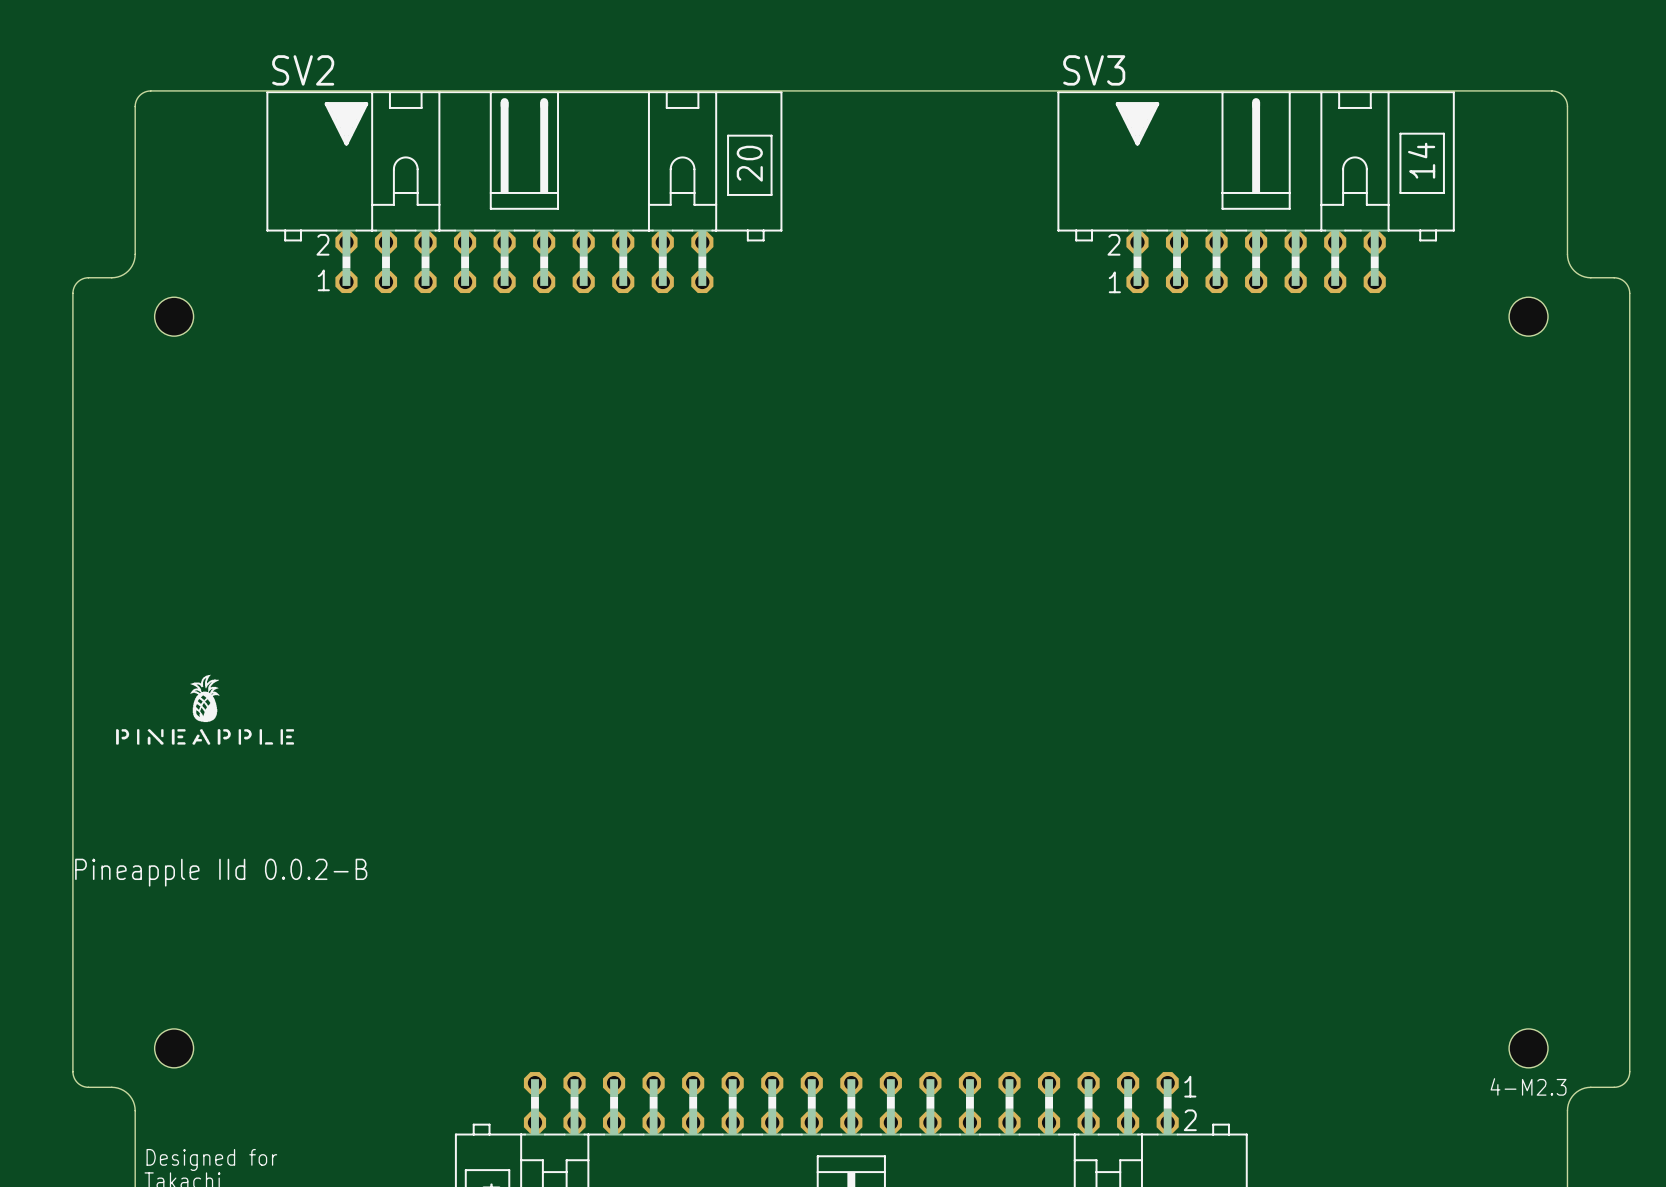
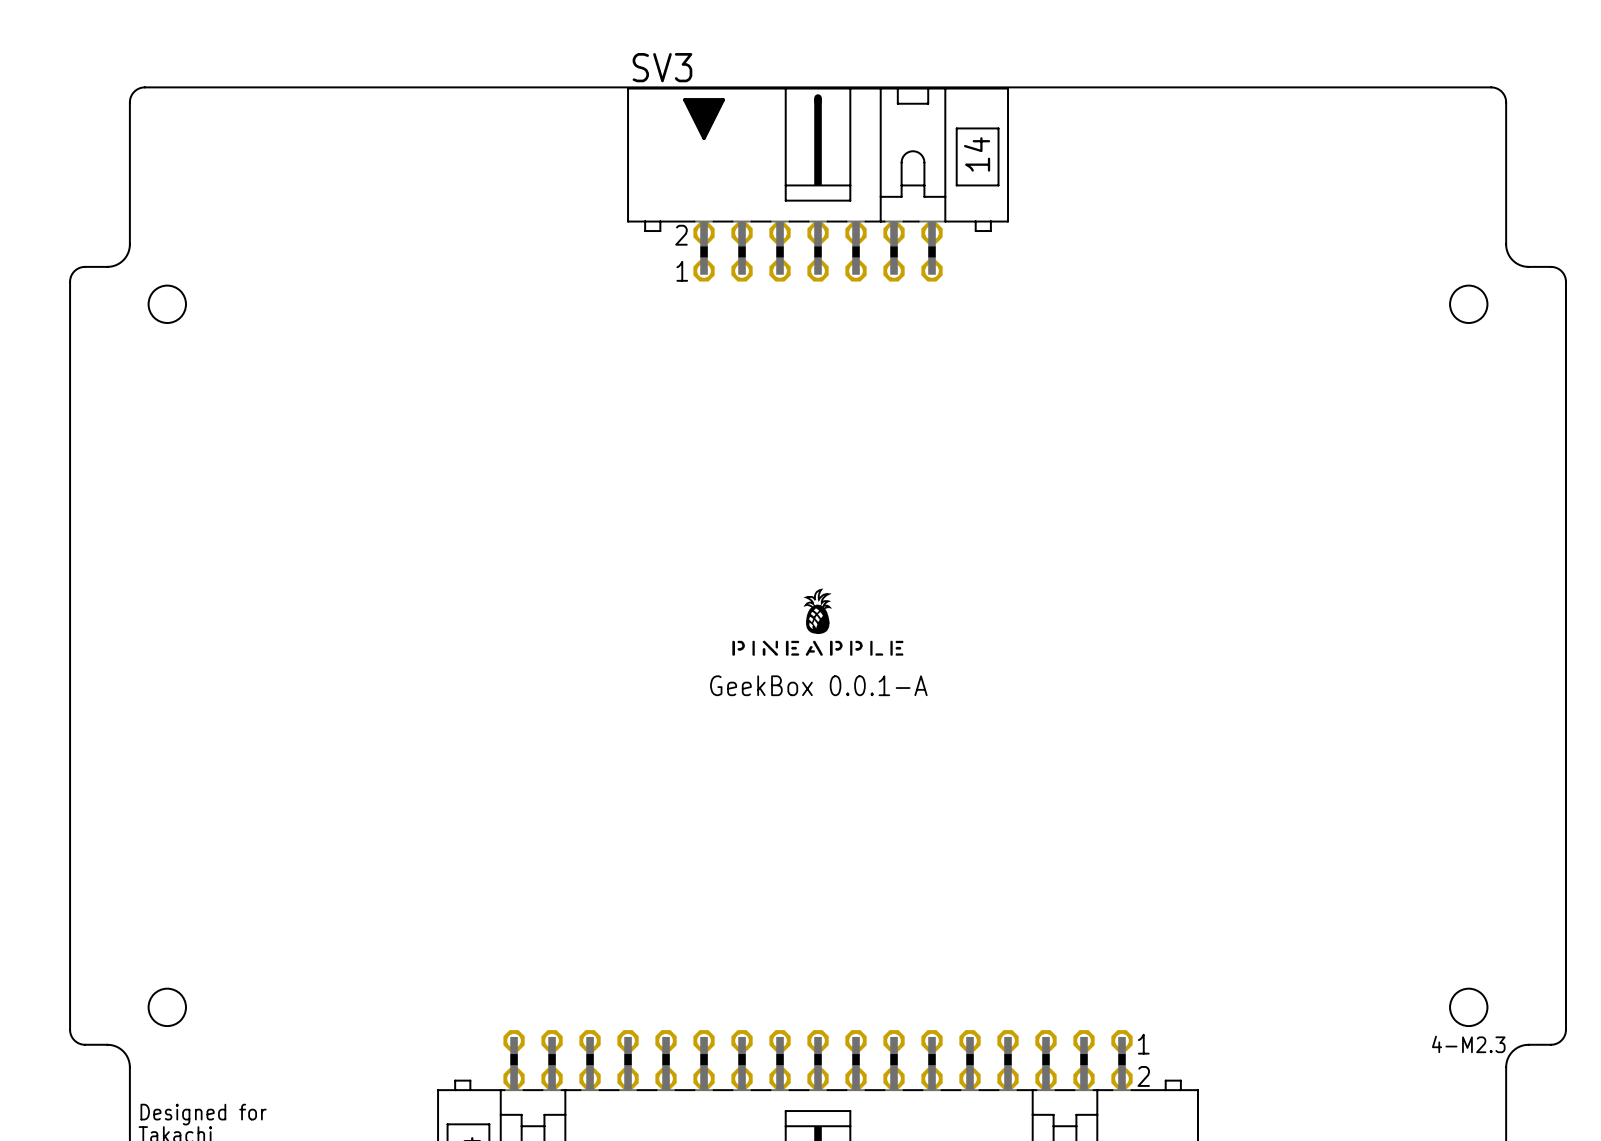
SV2: (524, 192) -> none
SV3 position: (1256, 192) -> (818, 184)
drawing: none -> [732, 588, 904, 656]
drawing: [116, 674, 295, 745] -> none
text: none -> GeekBox 0.0.1-A (818, 685)
text: Pineapple IId 0.0.2-B (221, 872) -> none

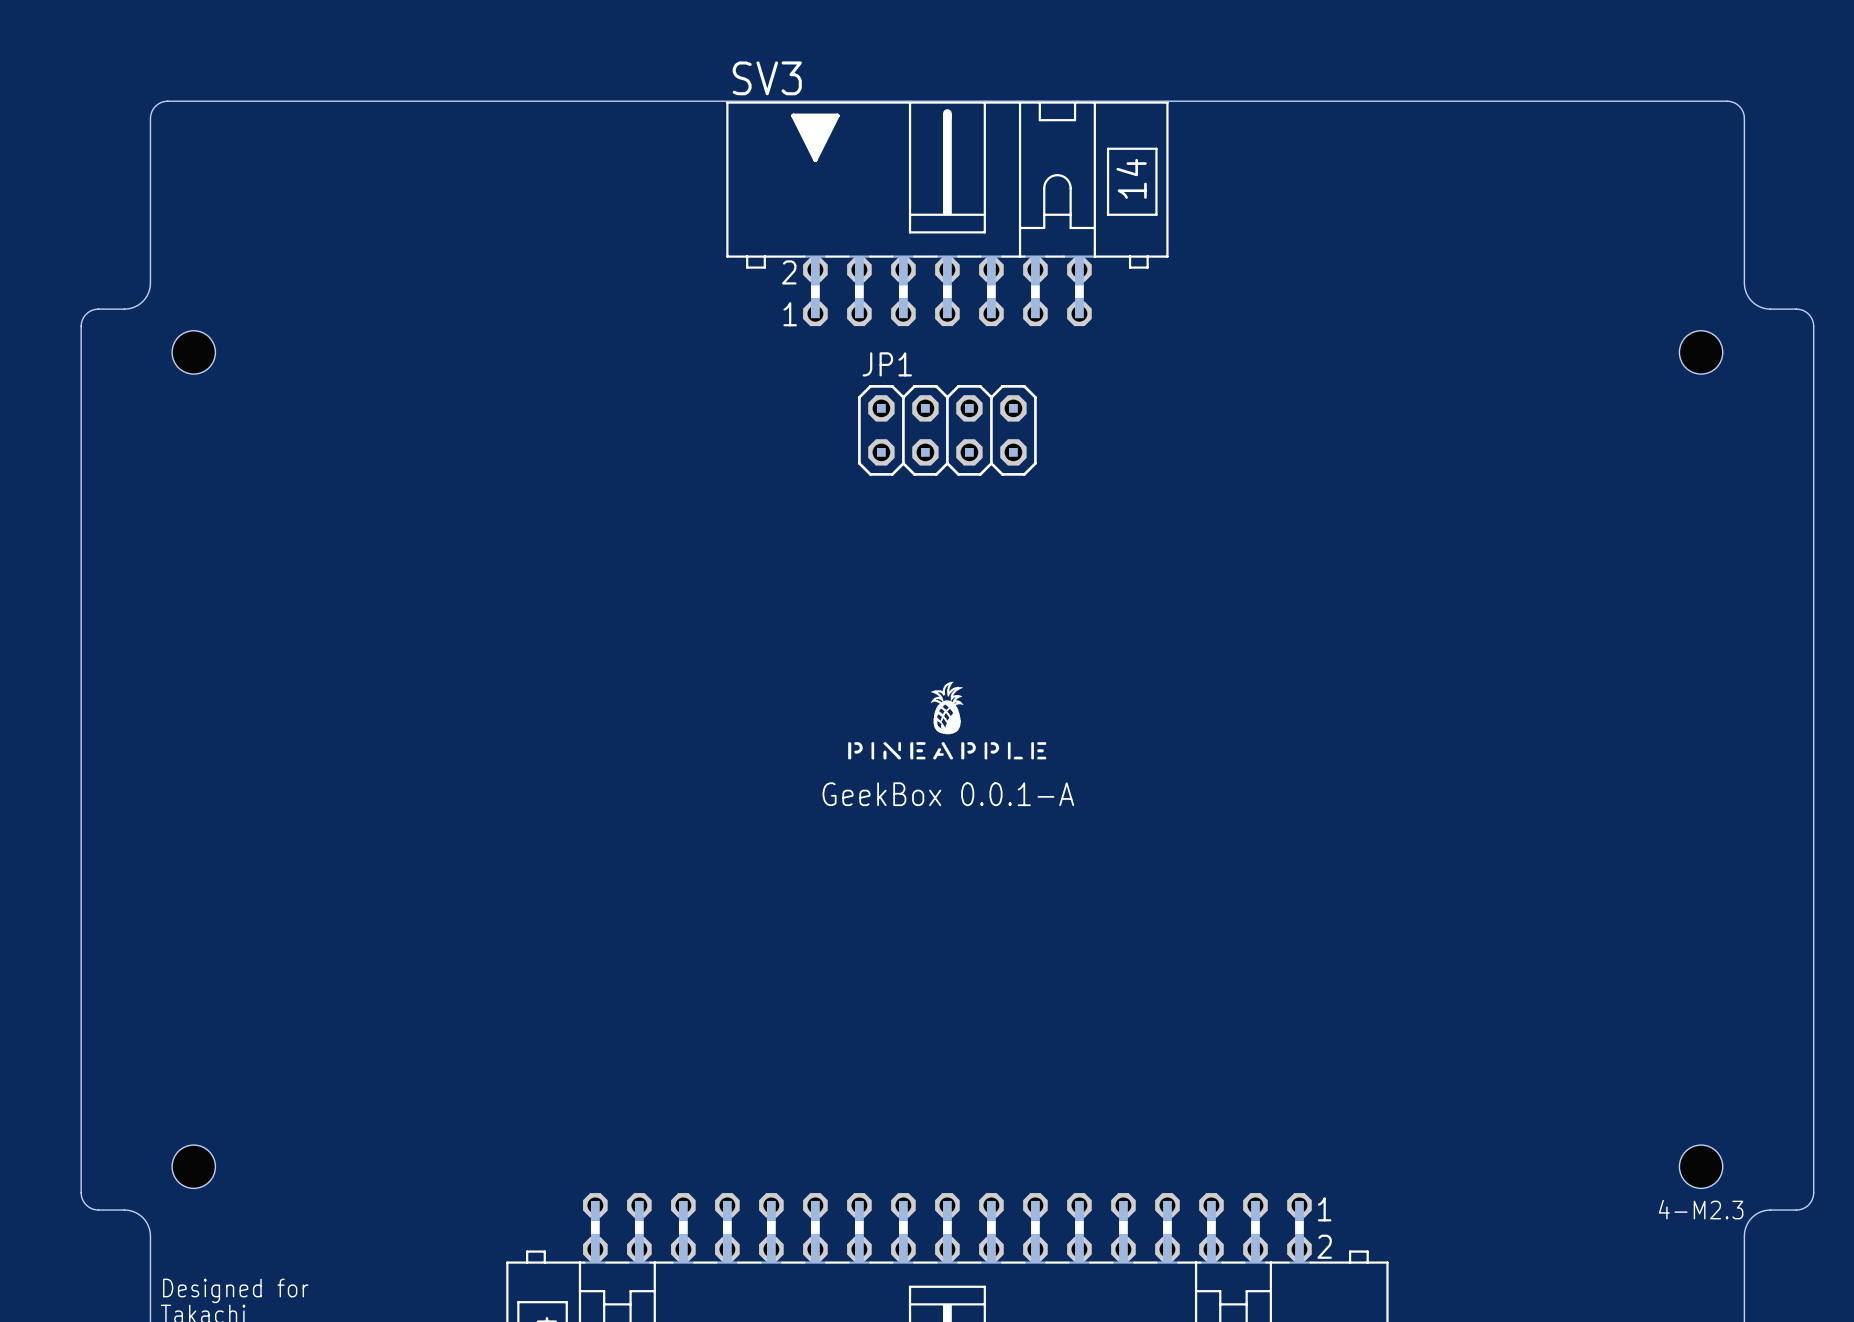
JP1: none -> (947, 430)

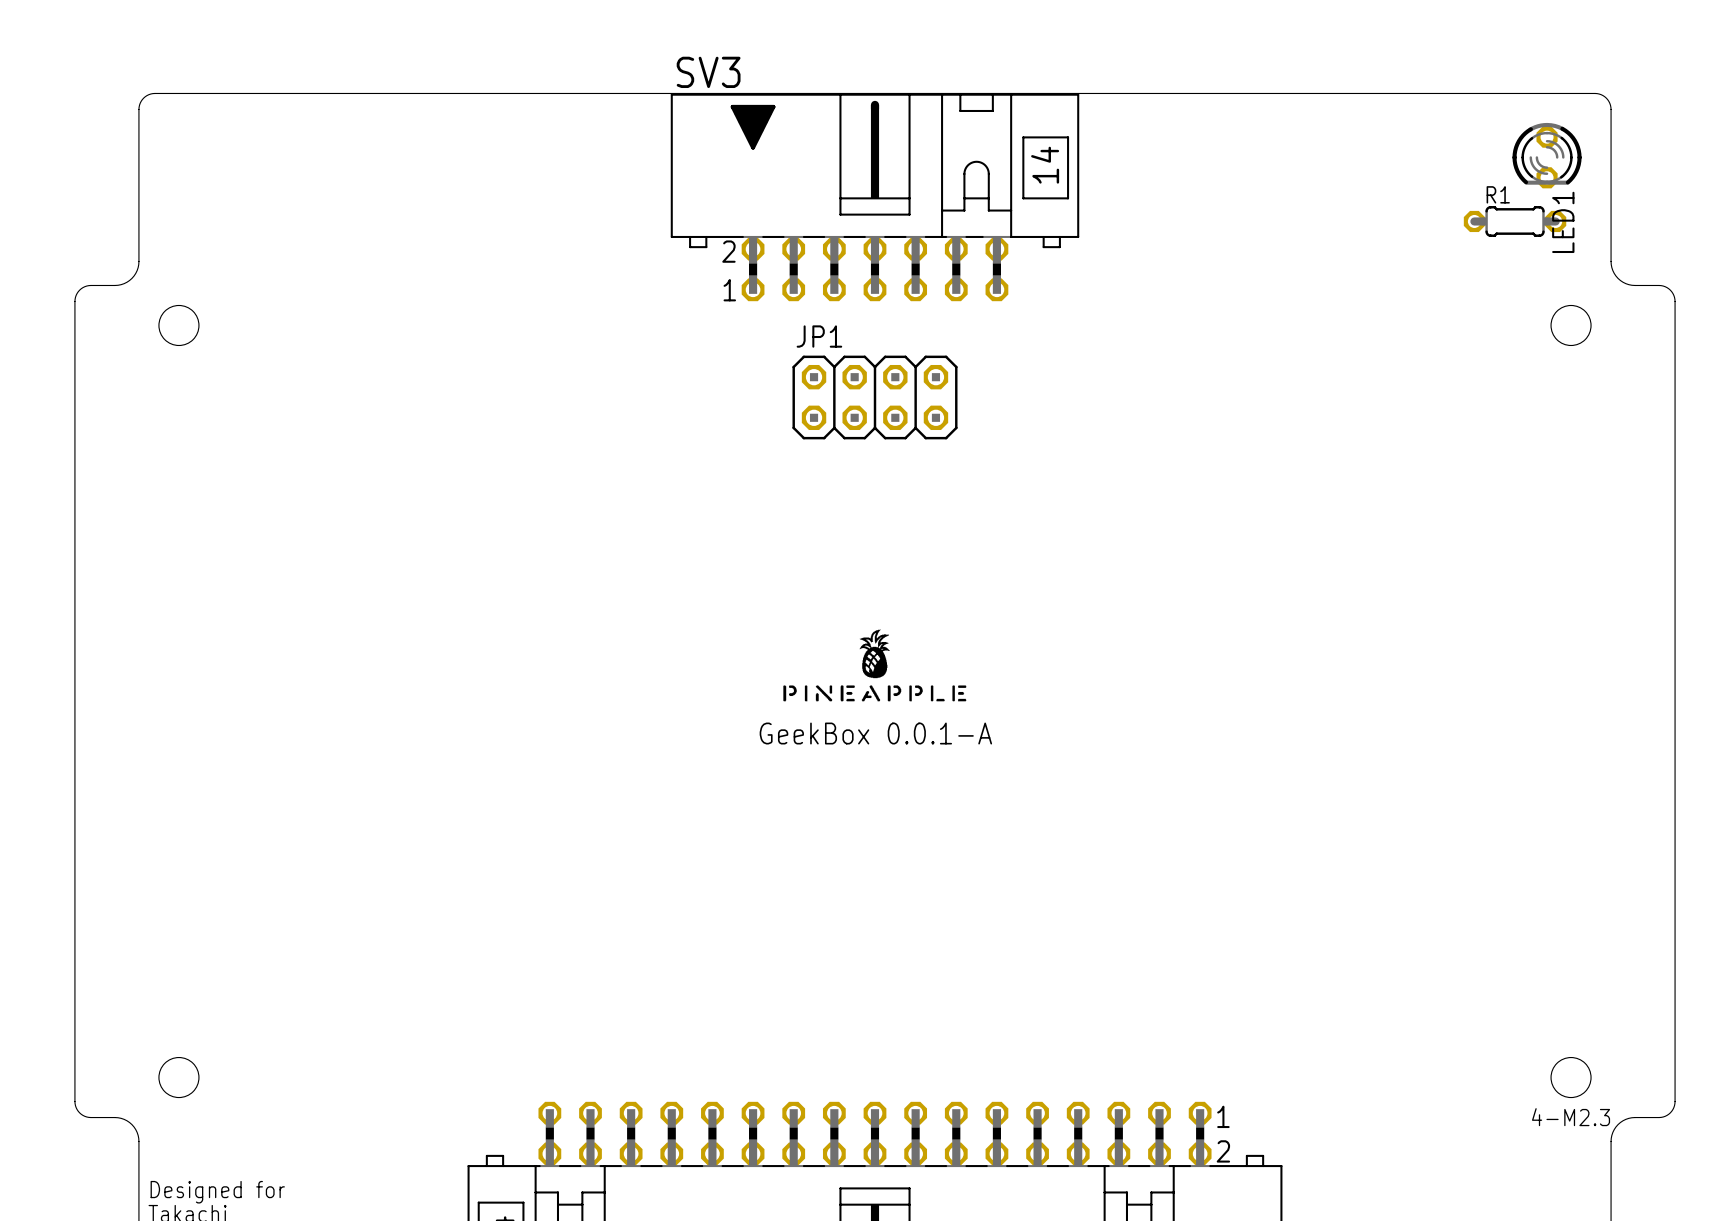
LED1: none -> (1547, 155)
R1: none -> (1515, 221)

